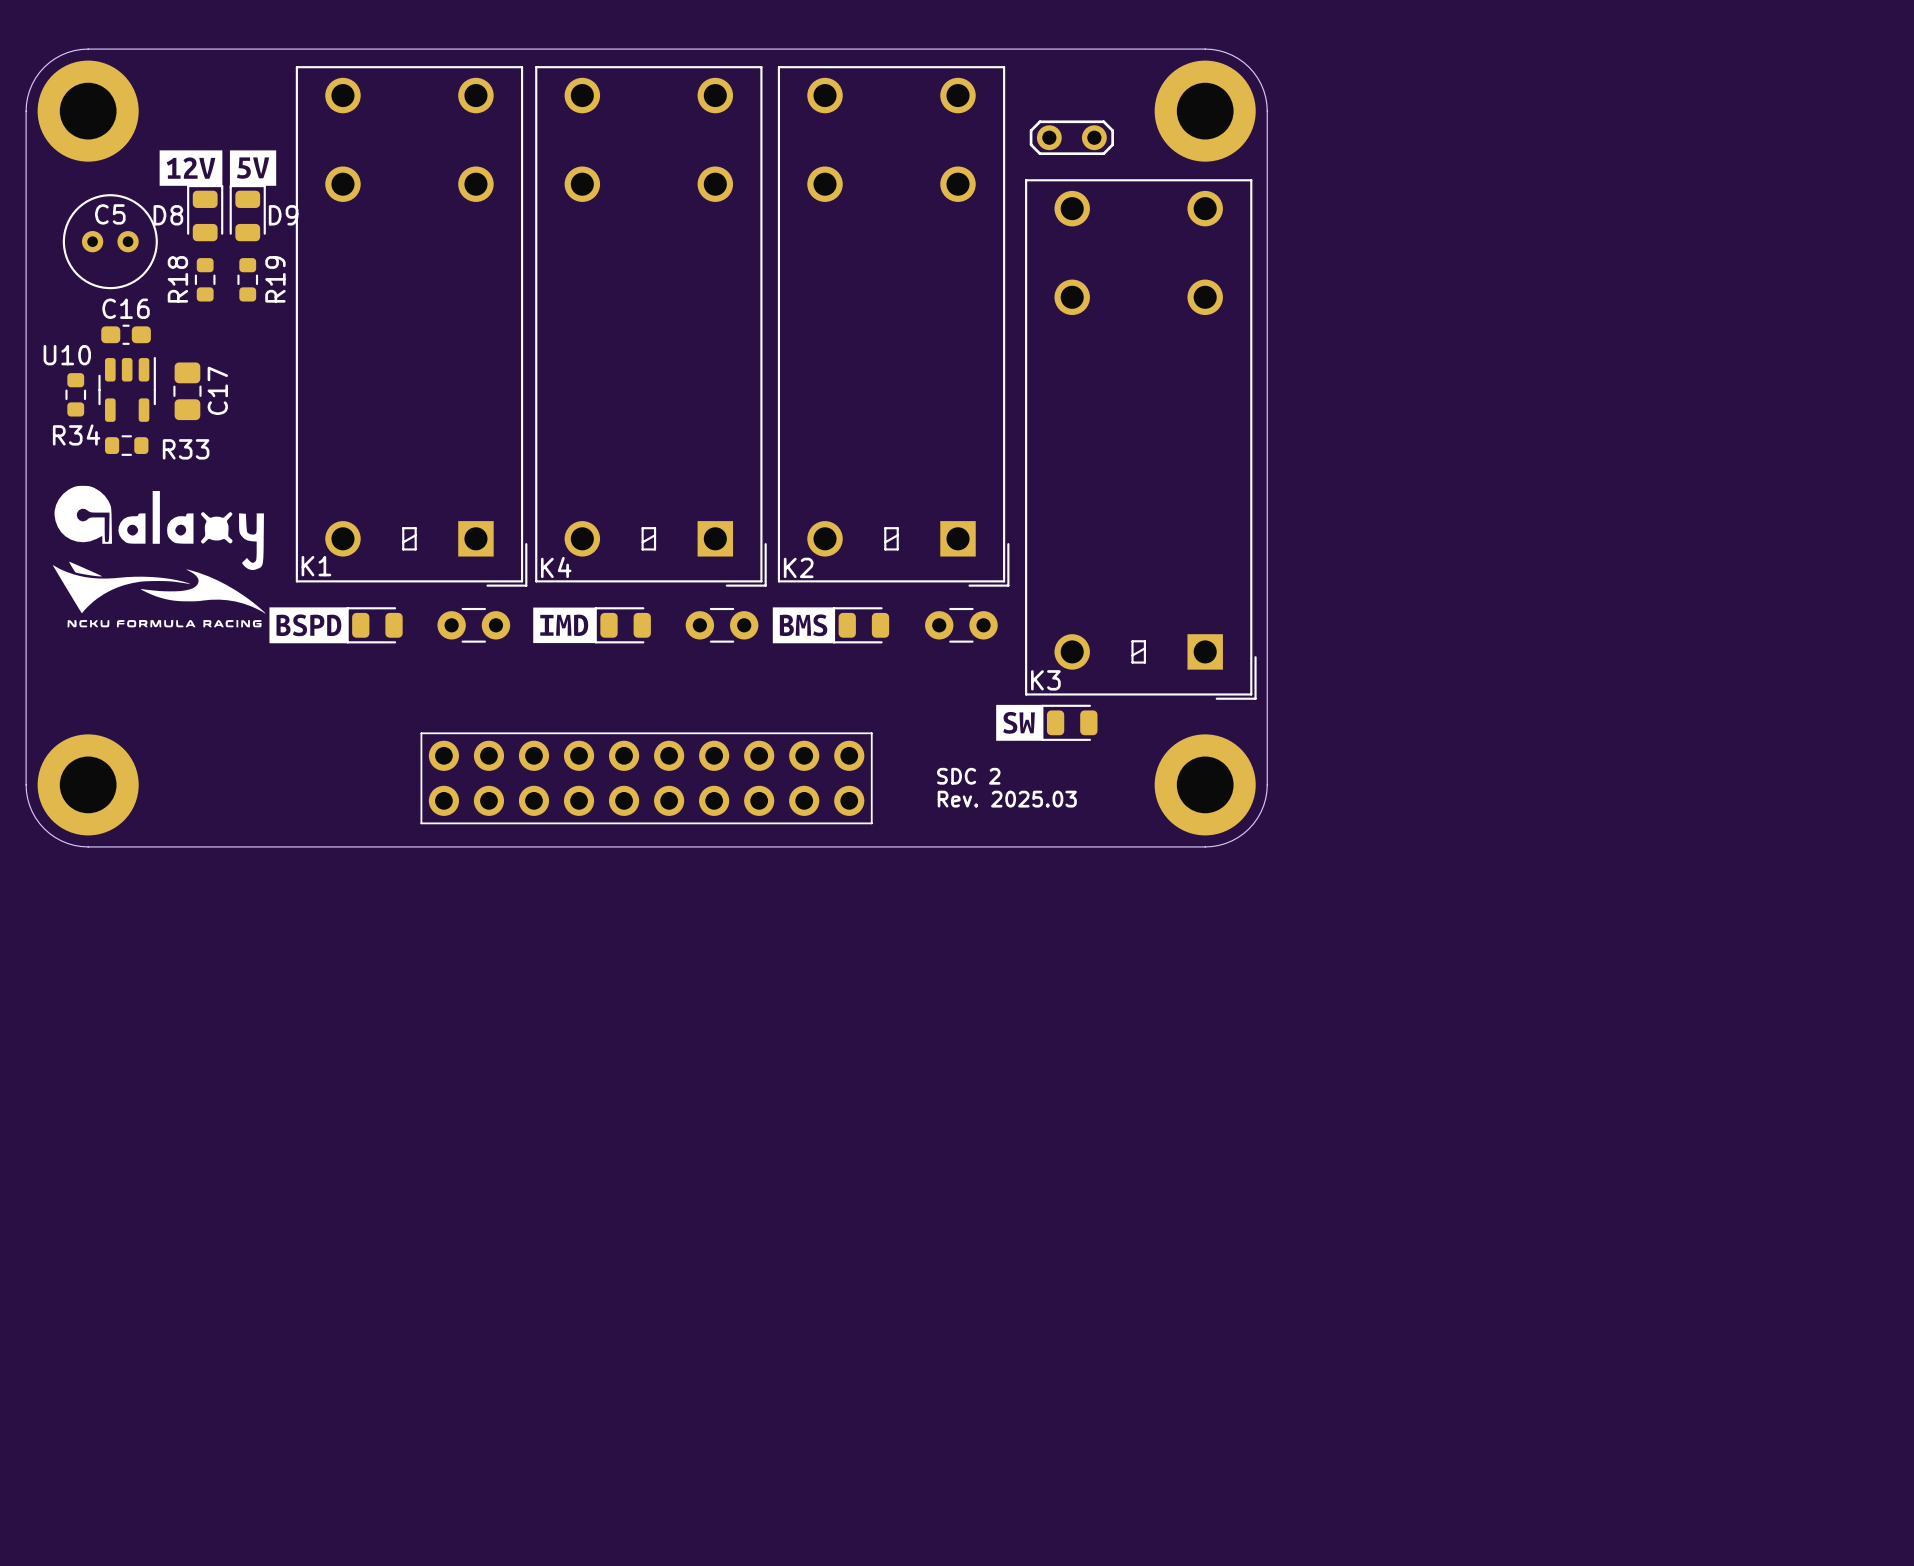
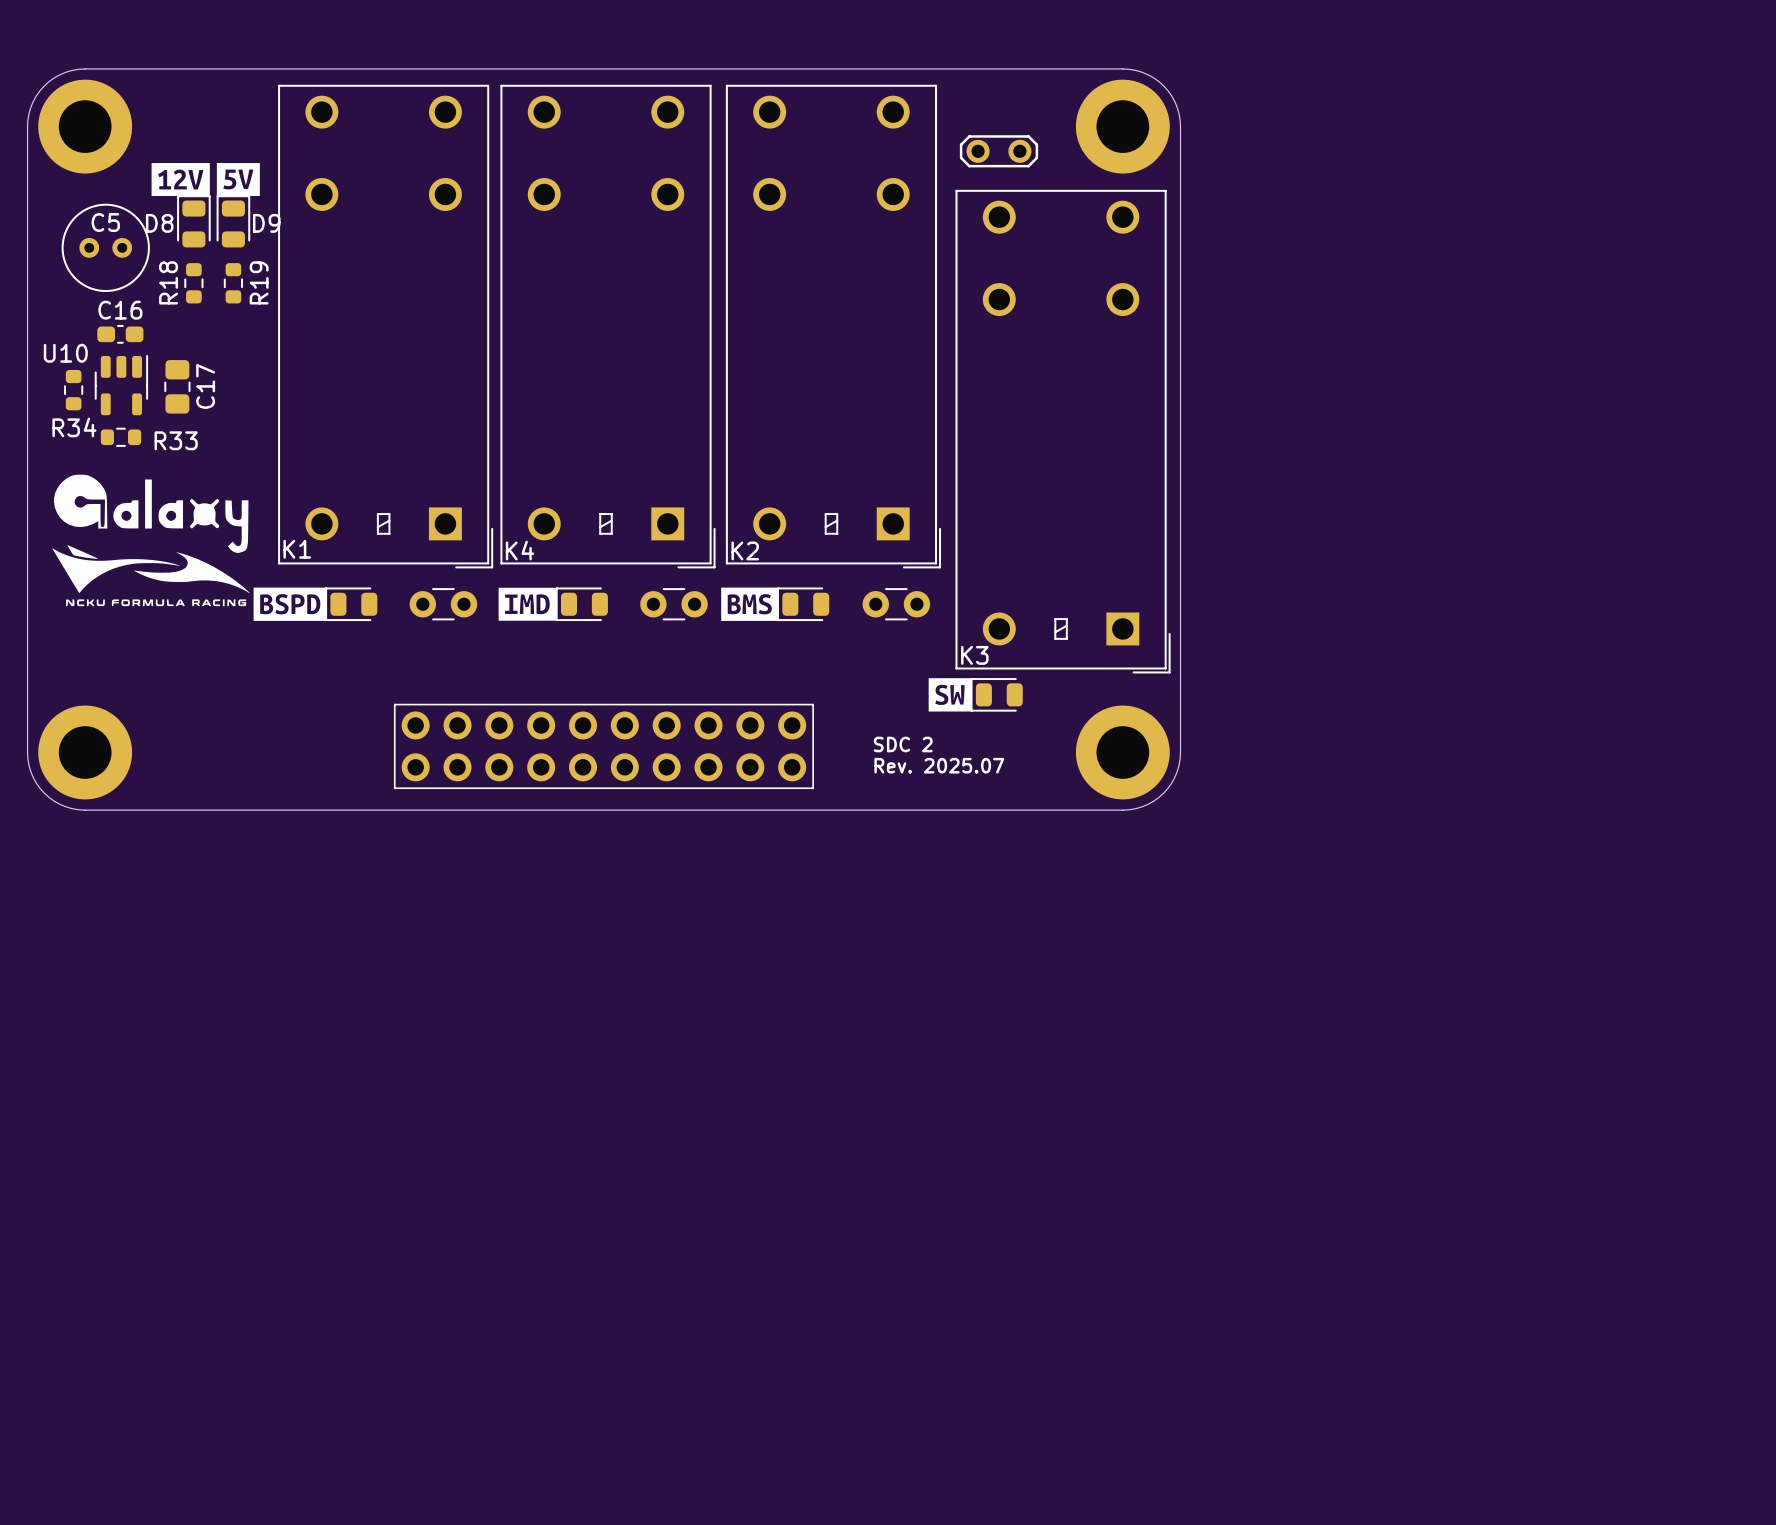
text: Rev. 2025.03 (1007, 799) -> Rev. 2025.07 (939, 765)

